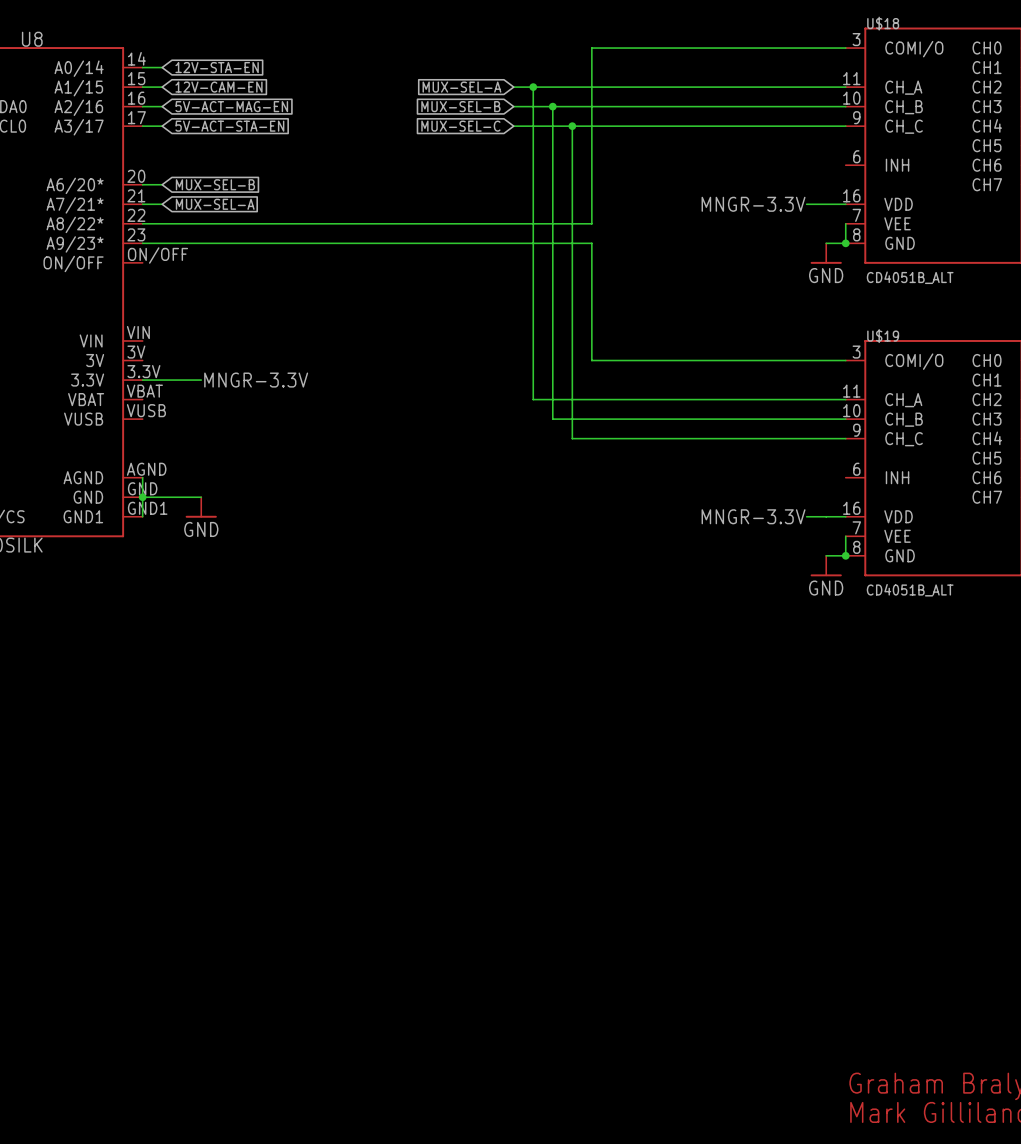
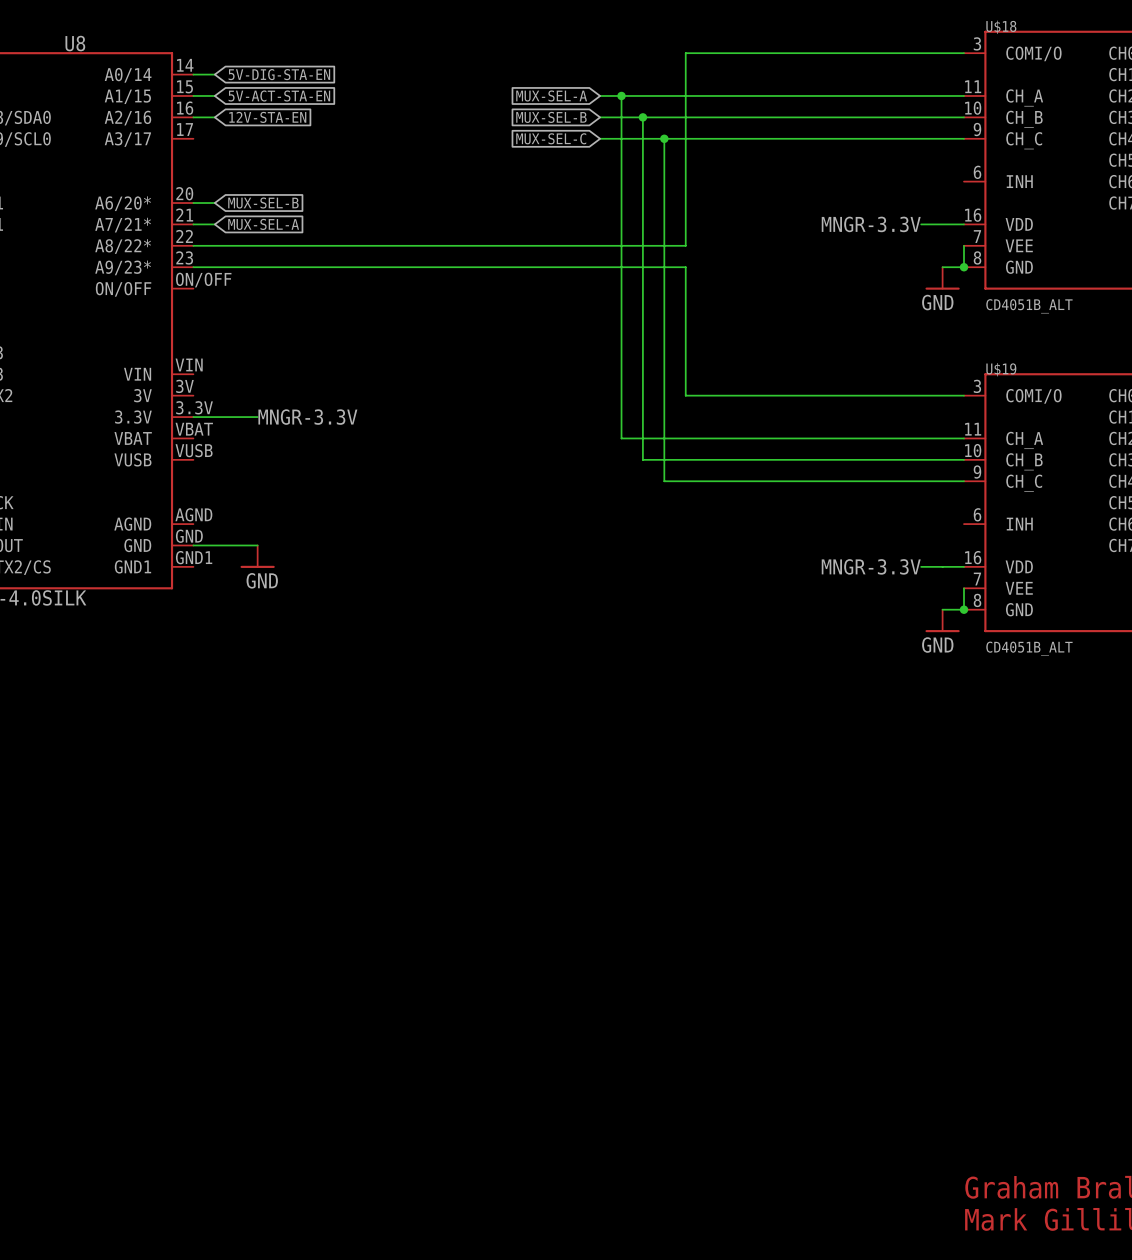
global label: 12V-STA-EN (217, 67) -> 5V-DIG-STA-EN (279, 74)
global label: 12V-CAM-EN (218, 87) -> 5V-ACT-STA-EN (279, 95)
global label: 5V-ACT-MAG-EN (231, 106) -> 12V-STA-EN (267, 117)
wire: (142, 126) (162, 126) -> none
global label: 5V-ACT-STA-EN (229, 126) -> none
wire: (142, 477) (142, 516) -> none
junction: (142, 497) -> none

